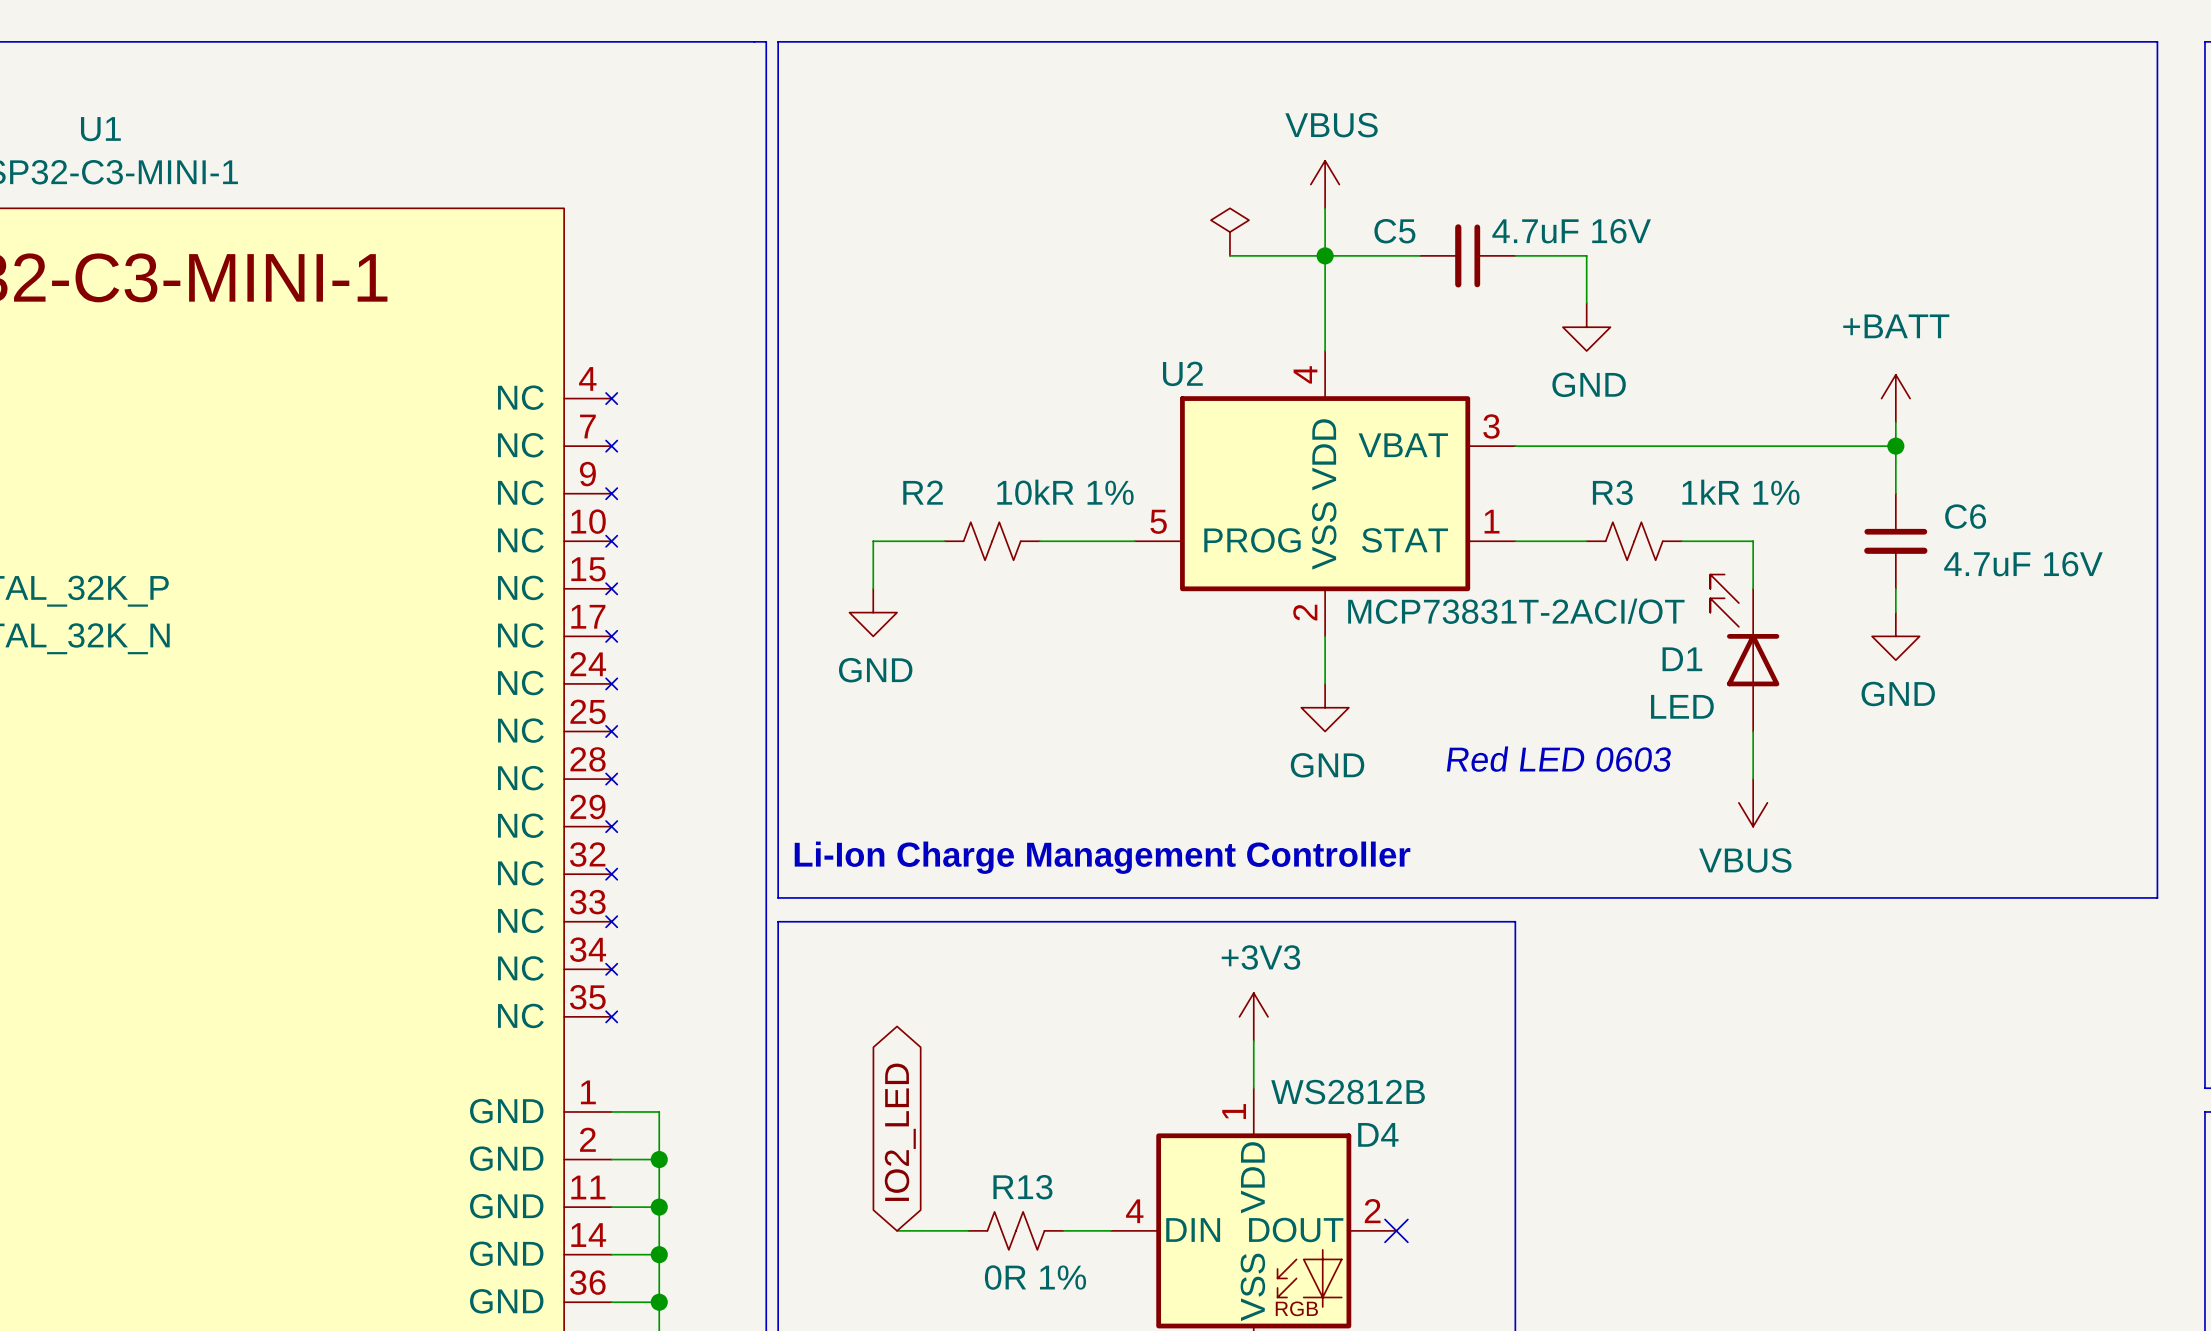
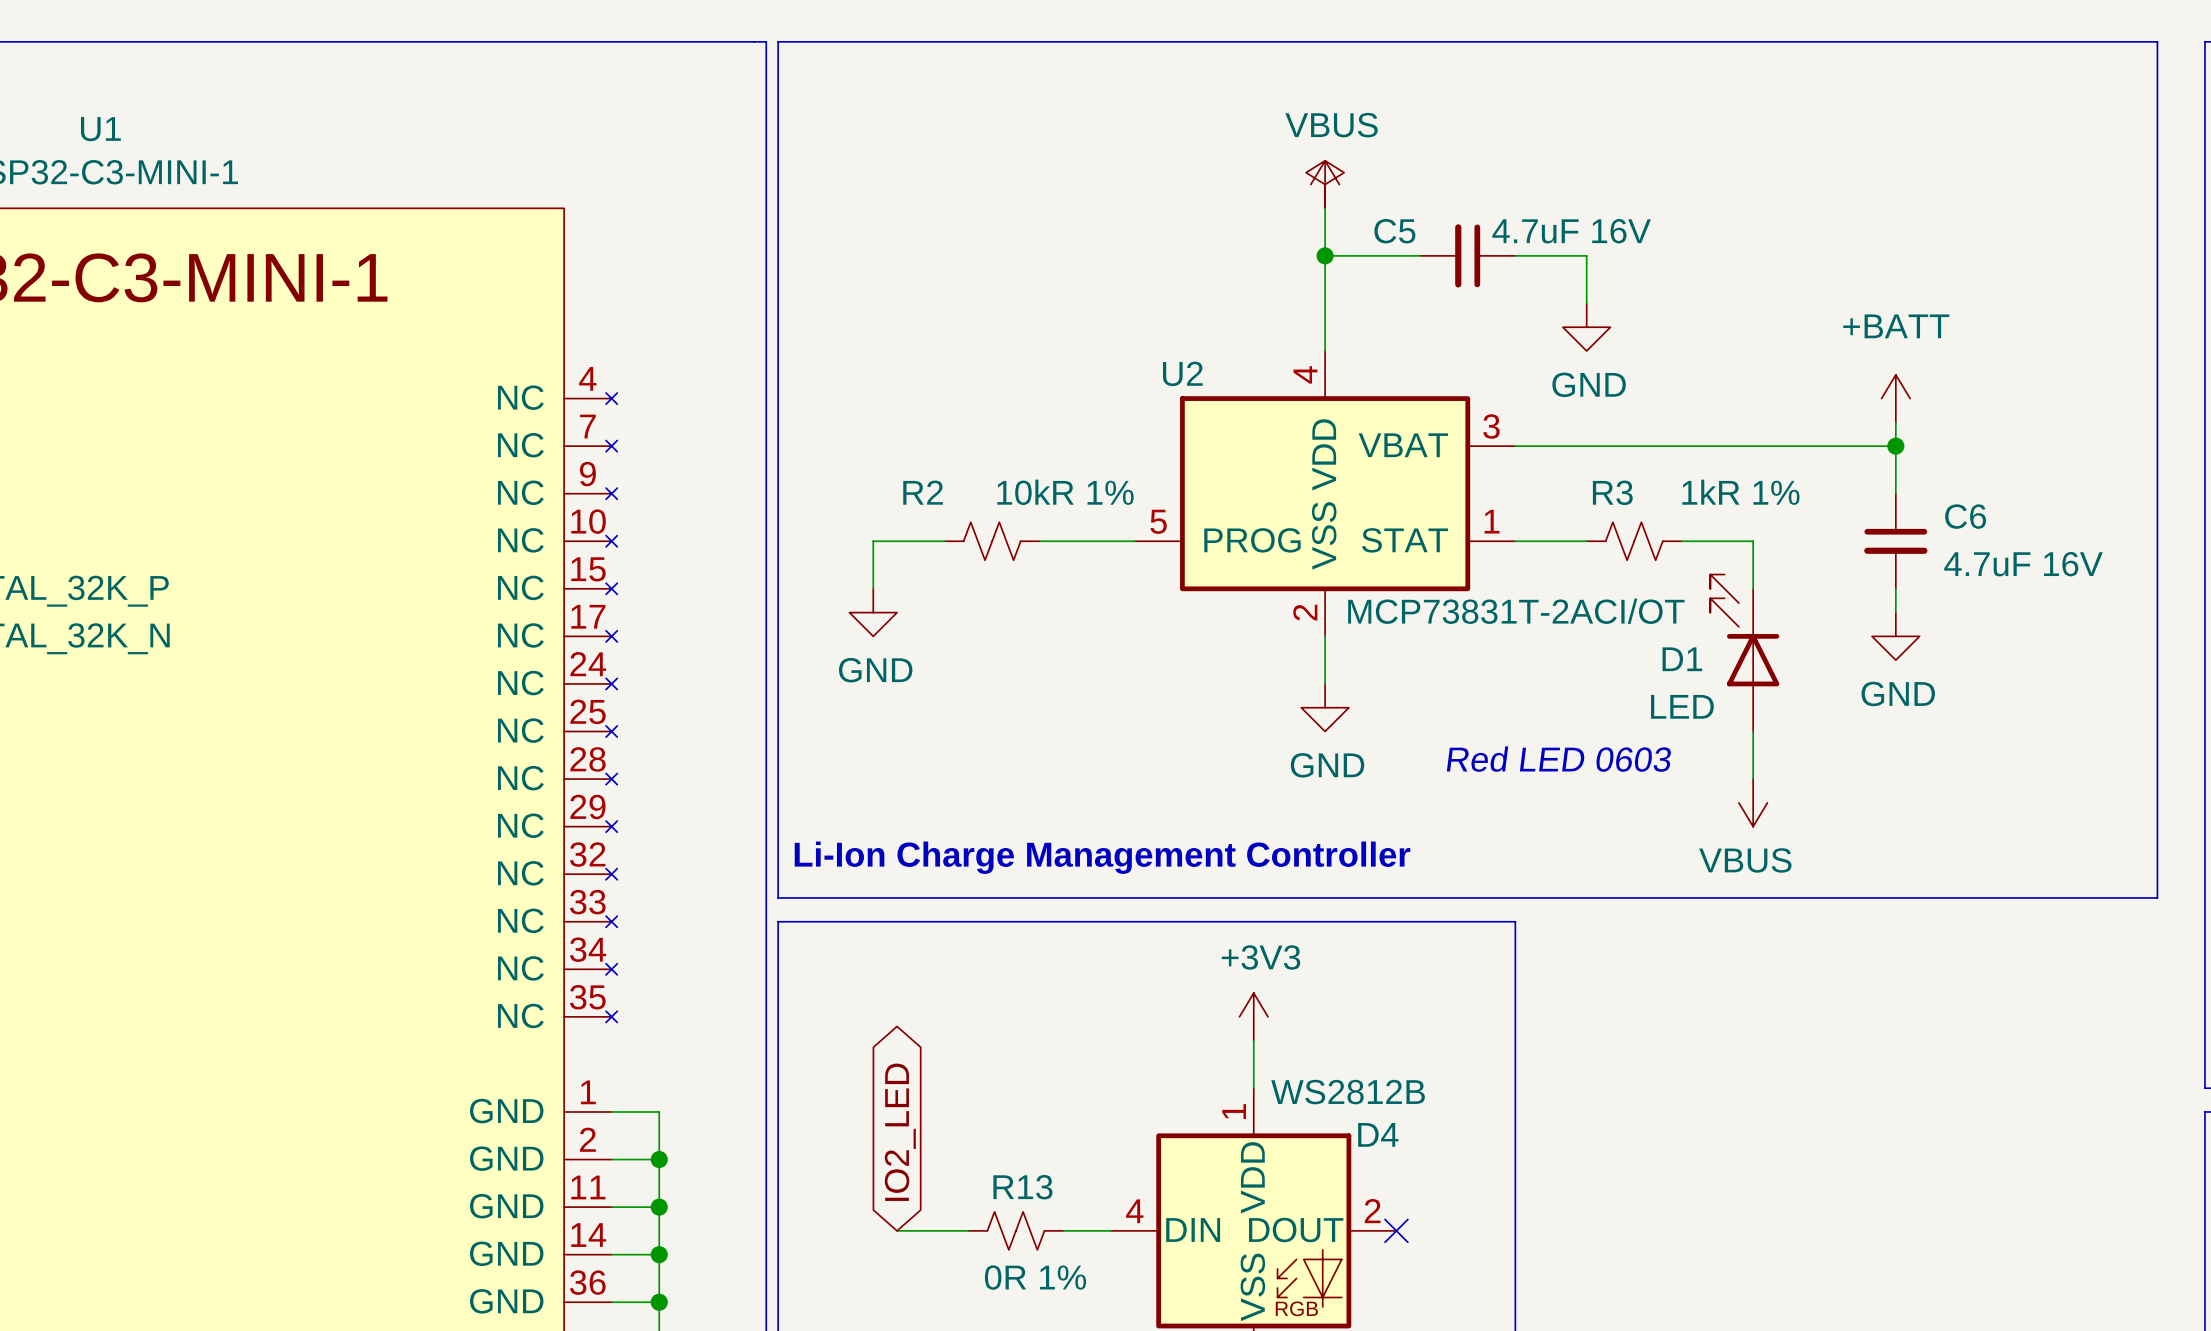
power symbol position: (1229, 232) -> (1325, 184)
wire: (1229, 255) (1325, 255) -> none

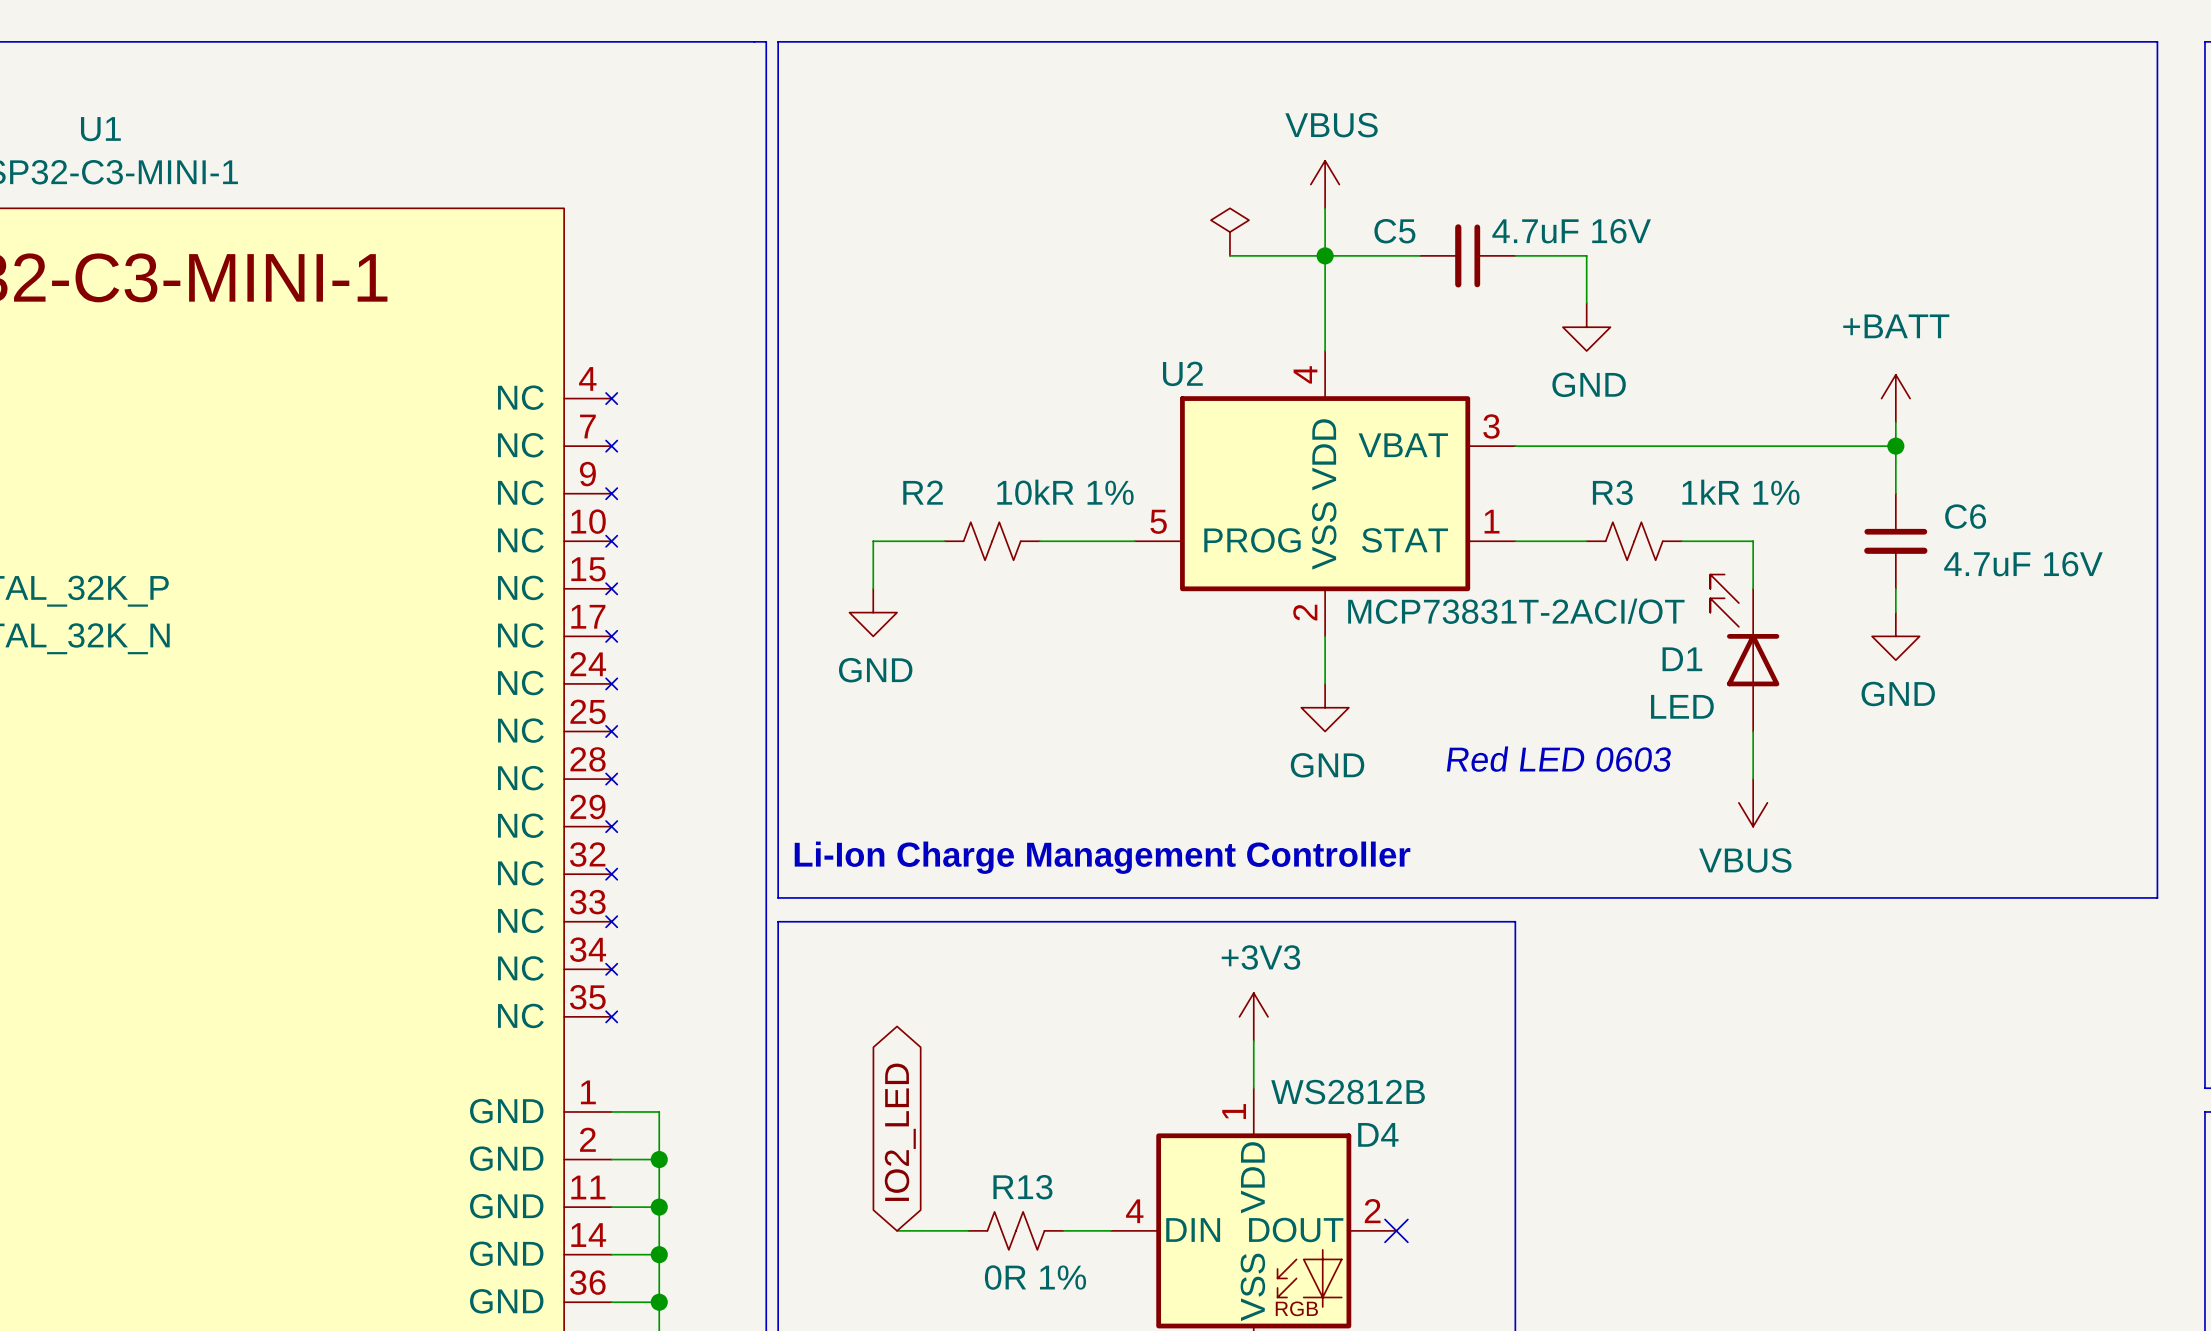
power symbol position: (1325, 184) -> (1229, 232)
wire: none -> (1229, 255) (1325, 255)

